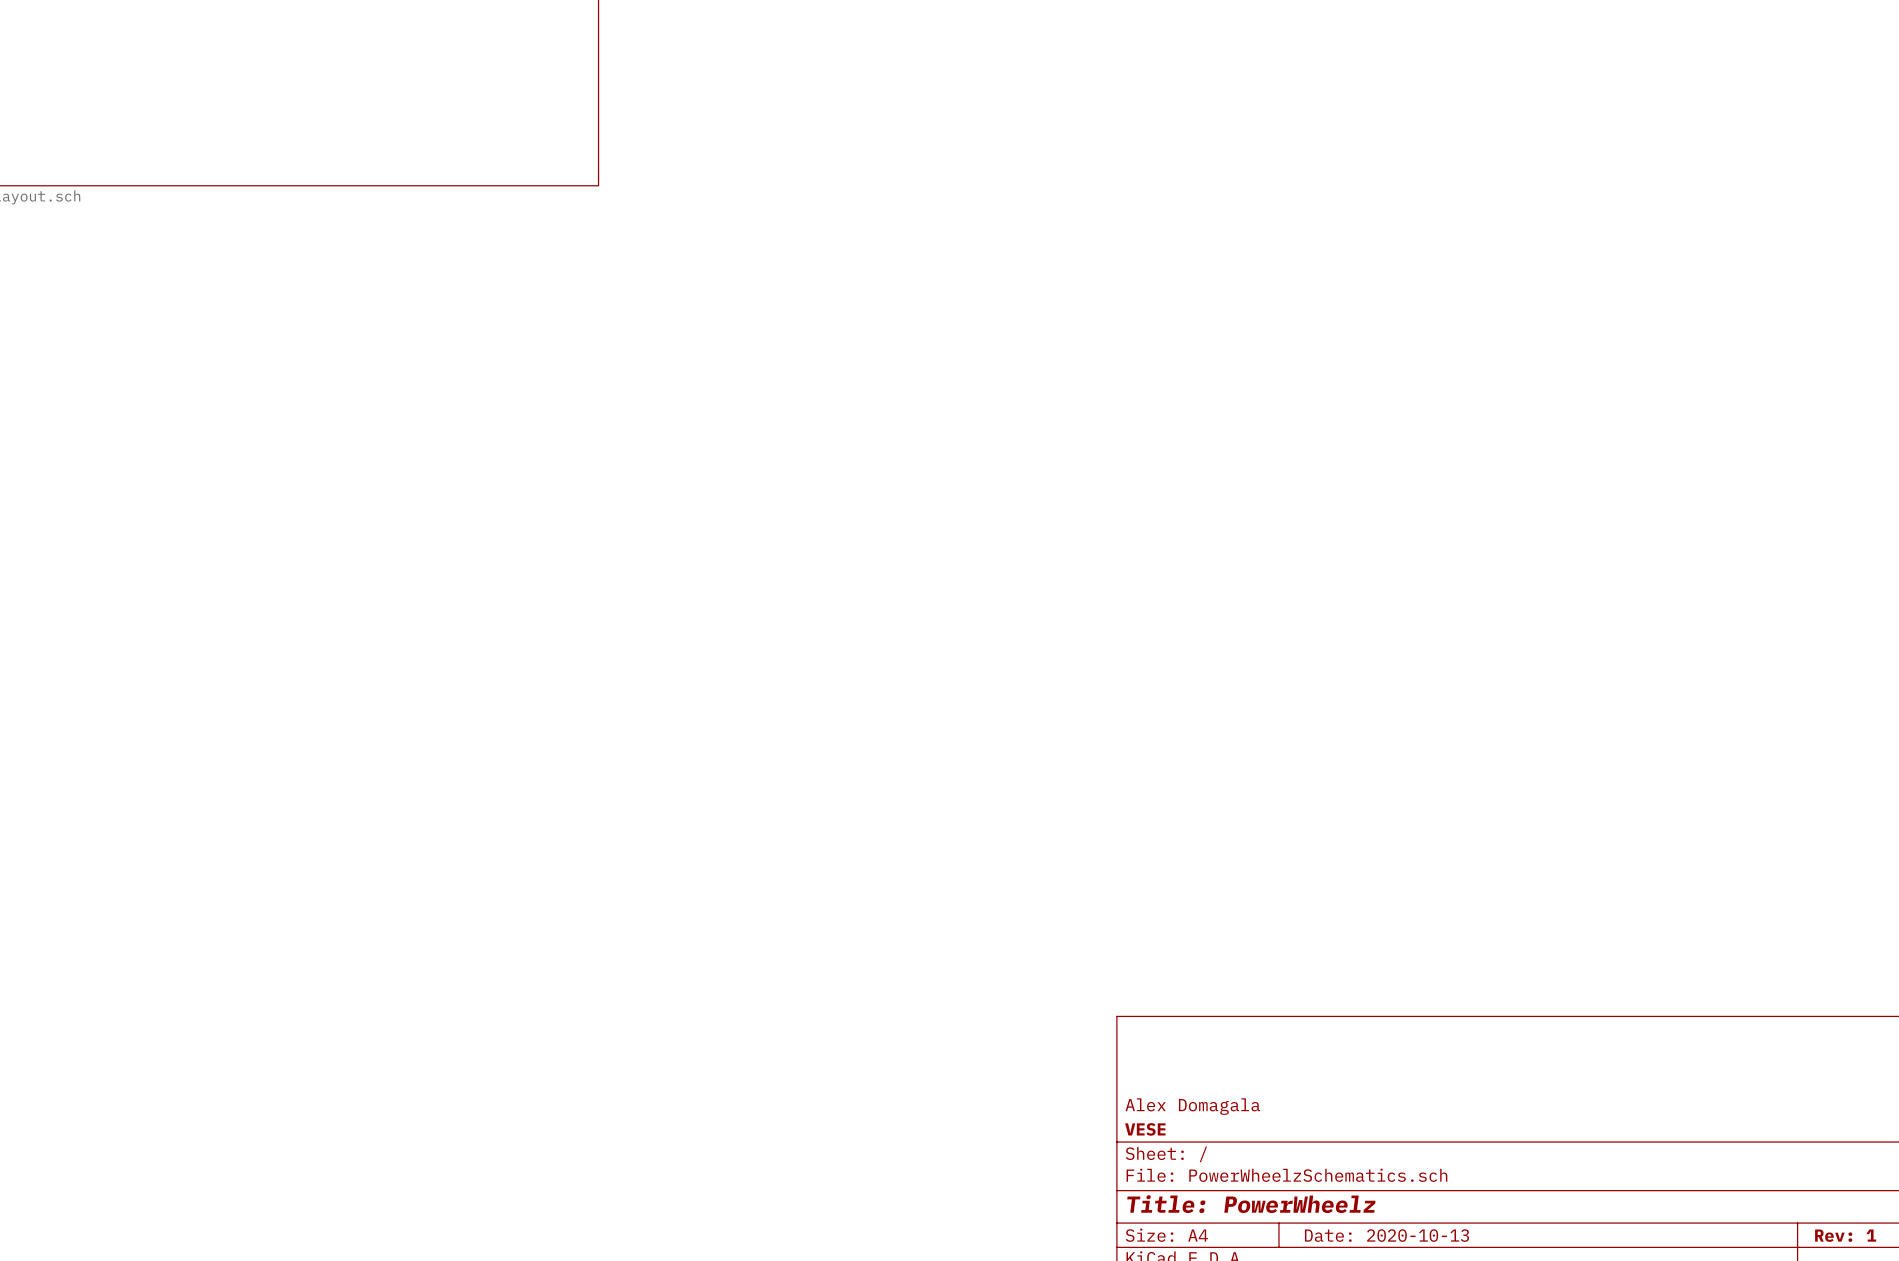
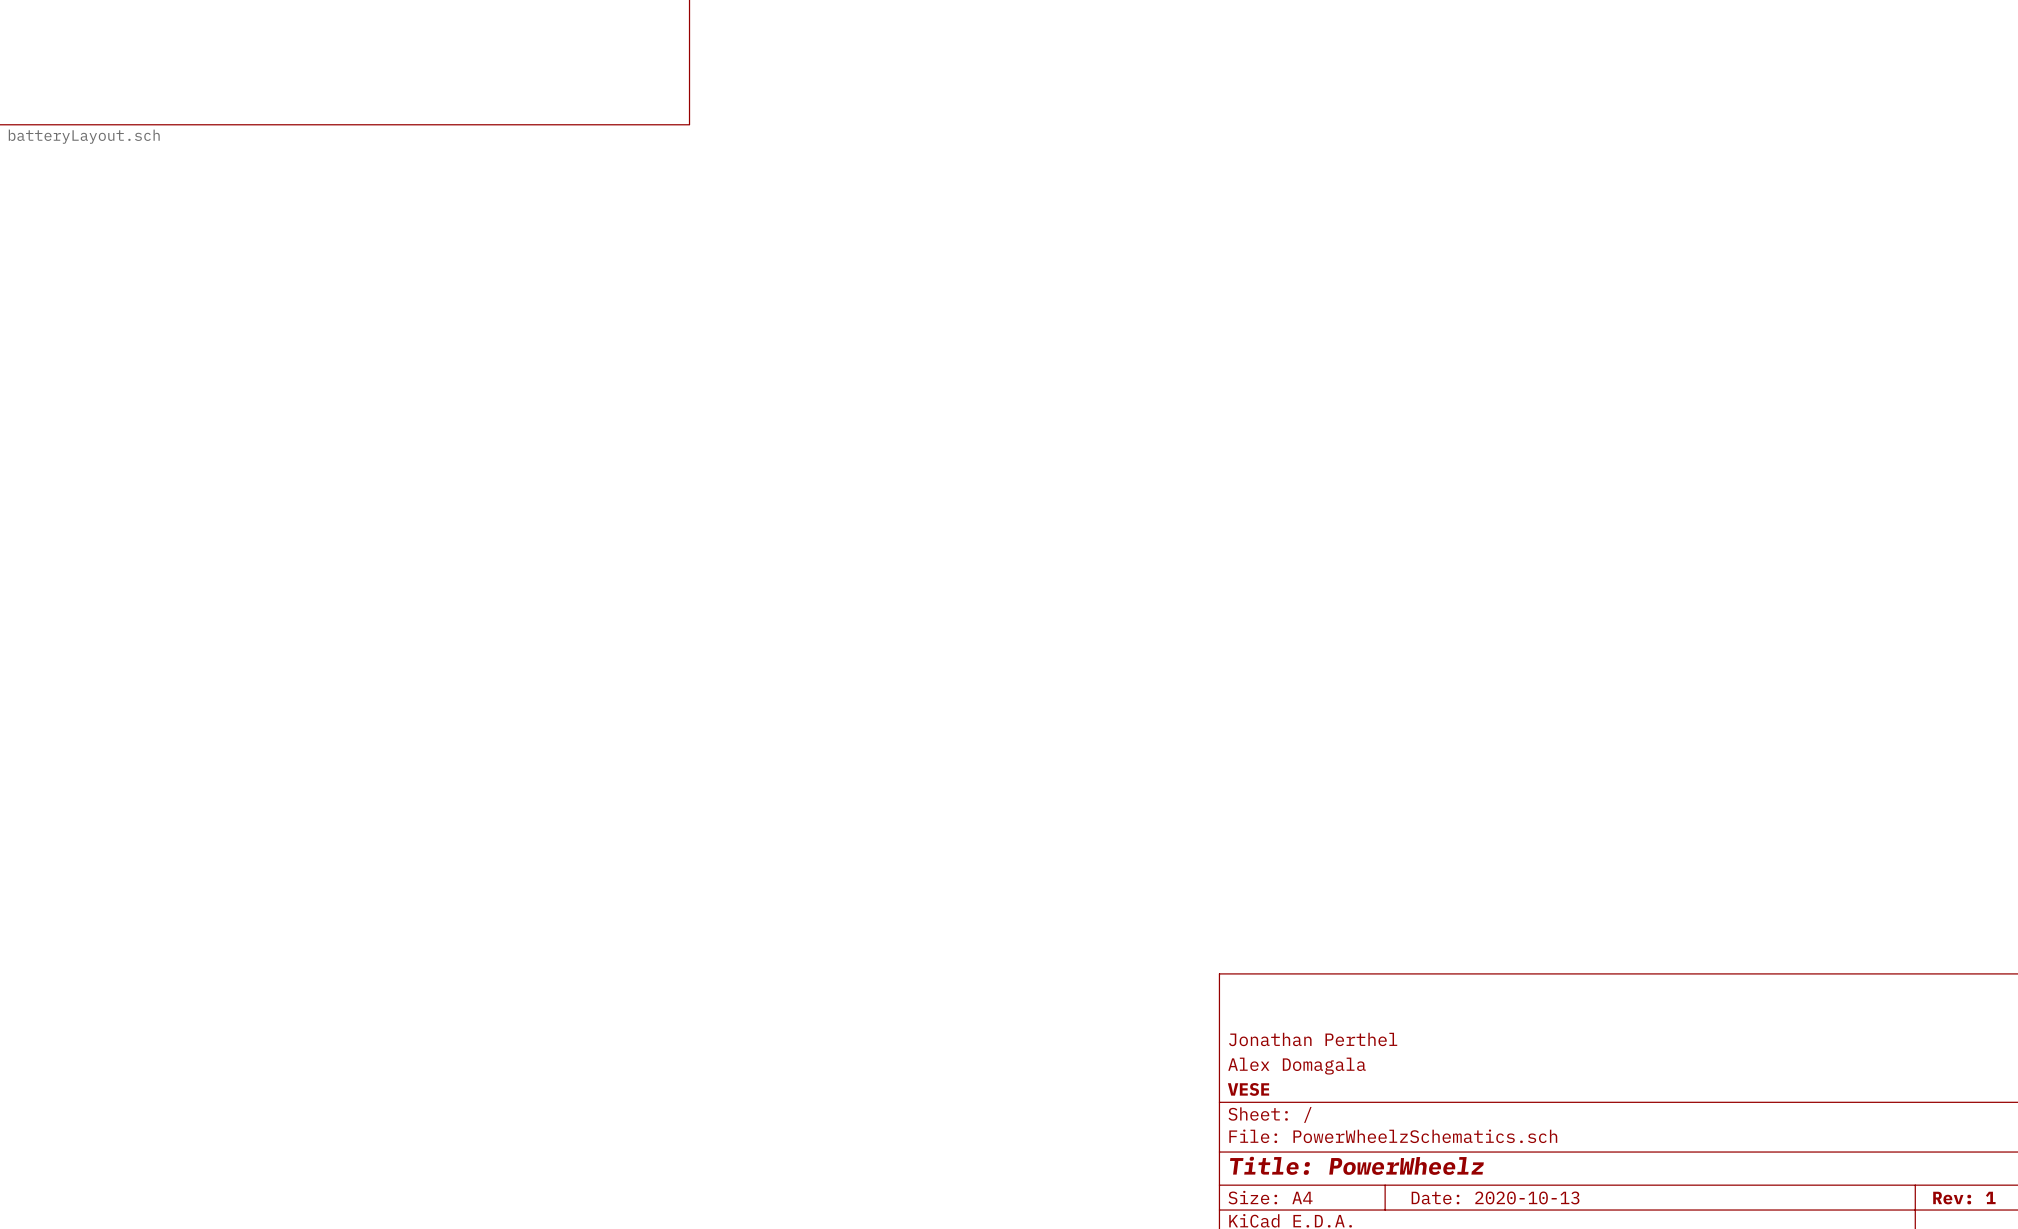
title block: none -> Jonathan Perthel (1313, 1039)

